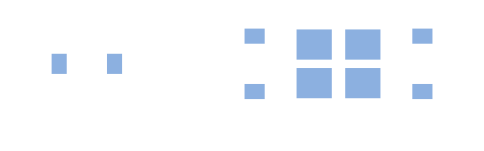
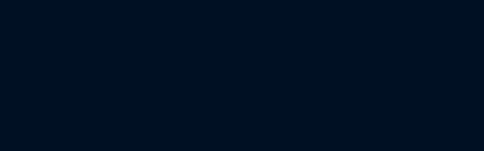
part: (86, 63) -> none
part: (254, 63) -> none
part: (338, 63) -> none
part: (422, 63) -> none

